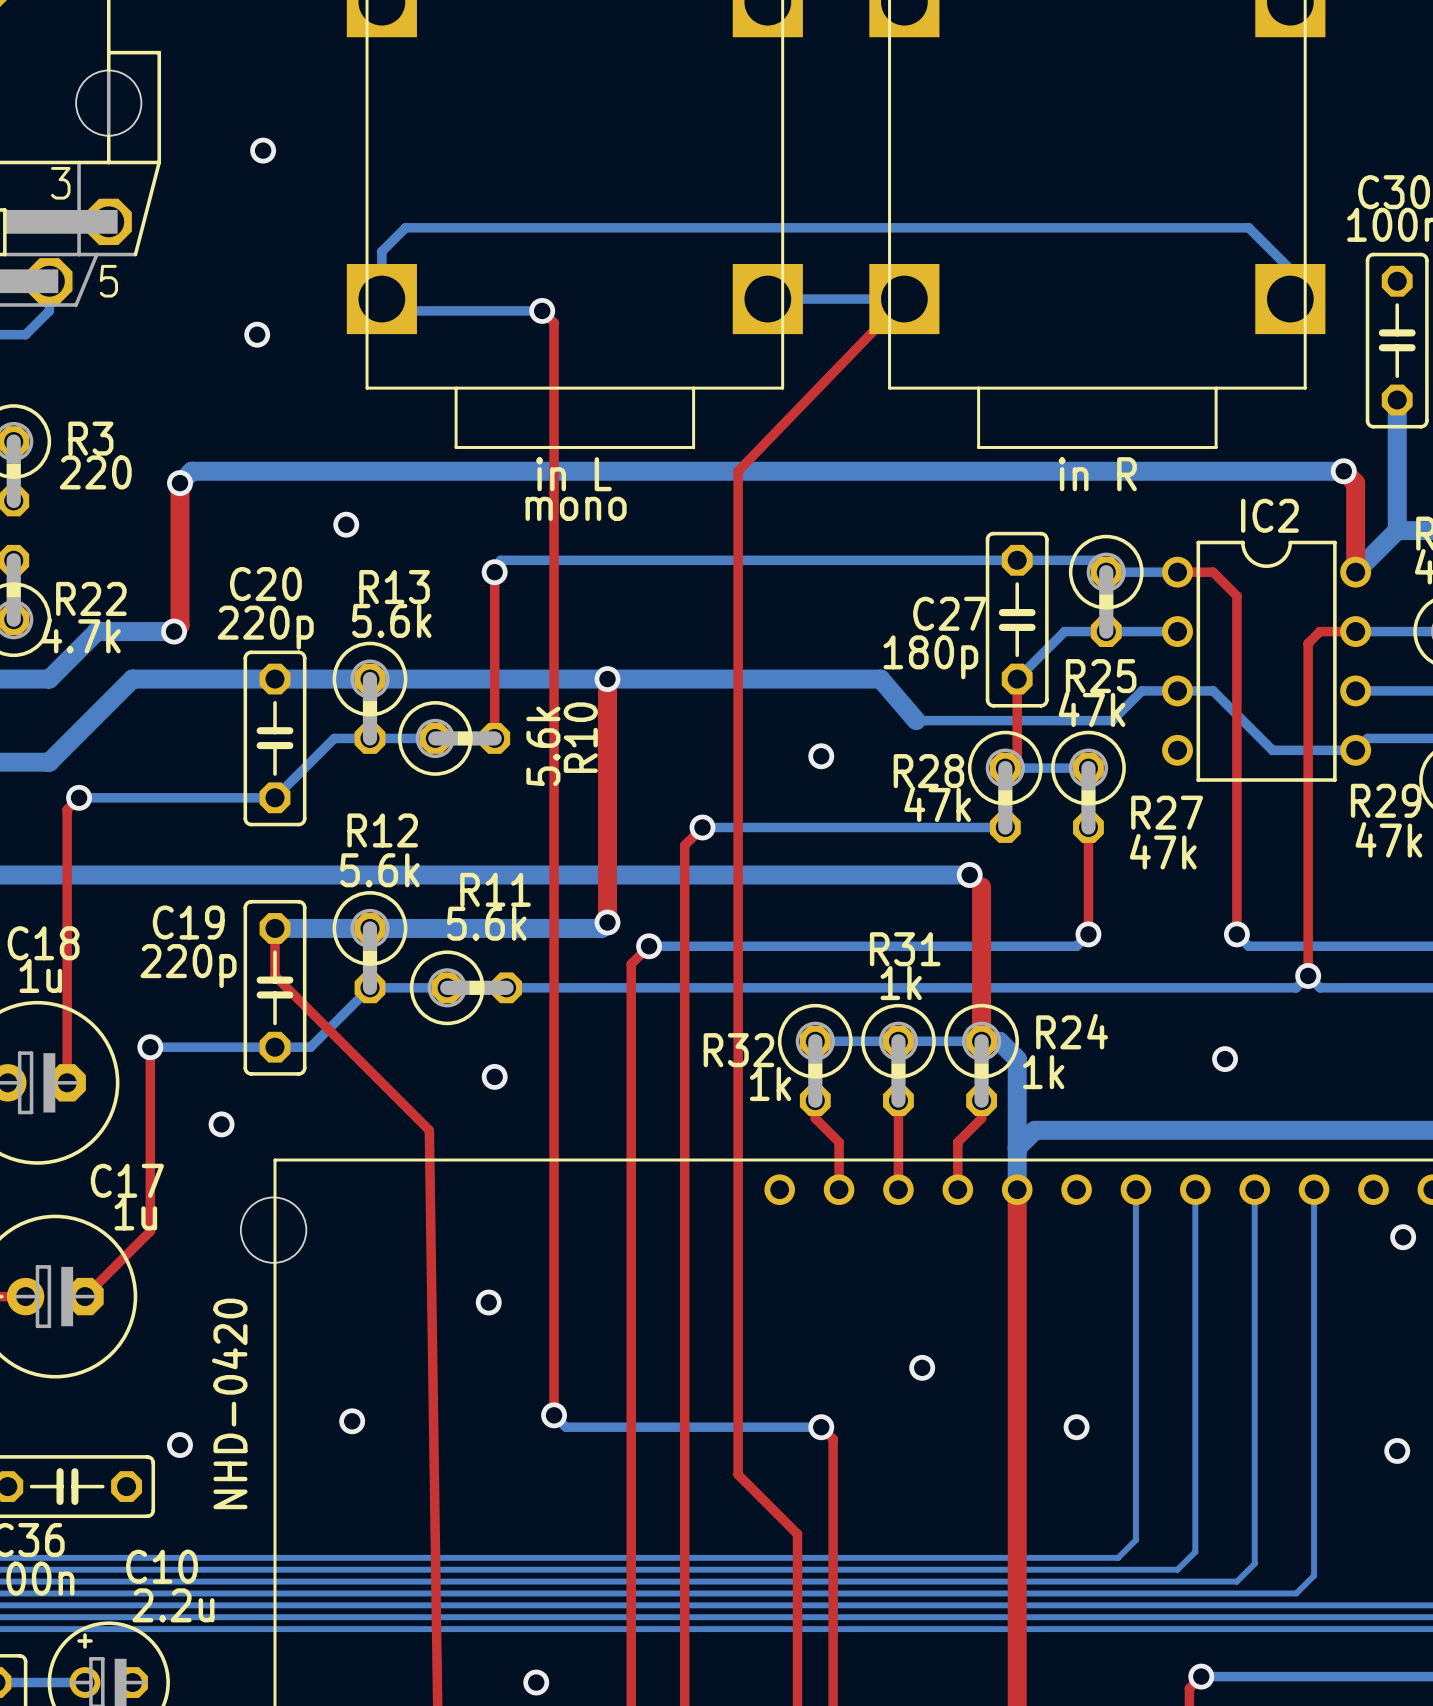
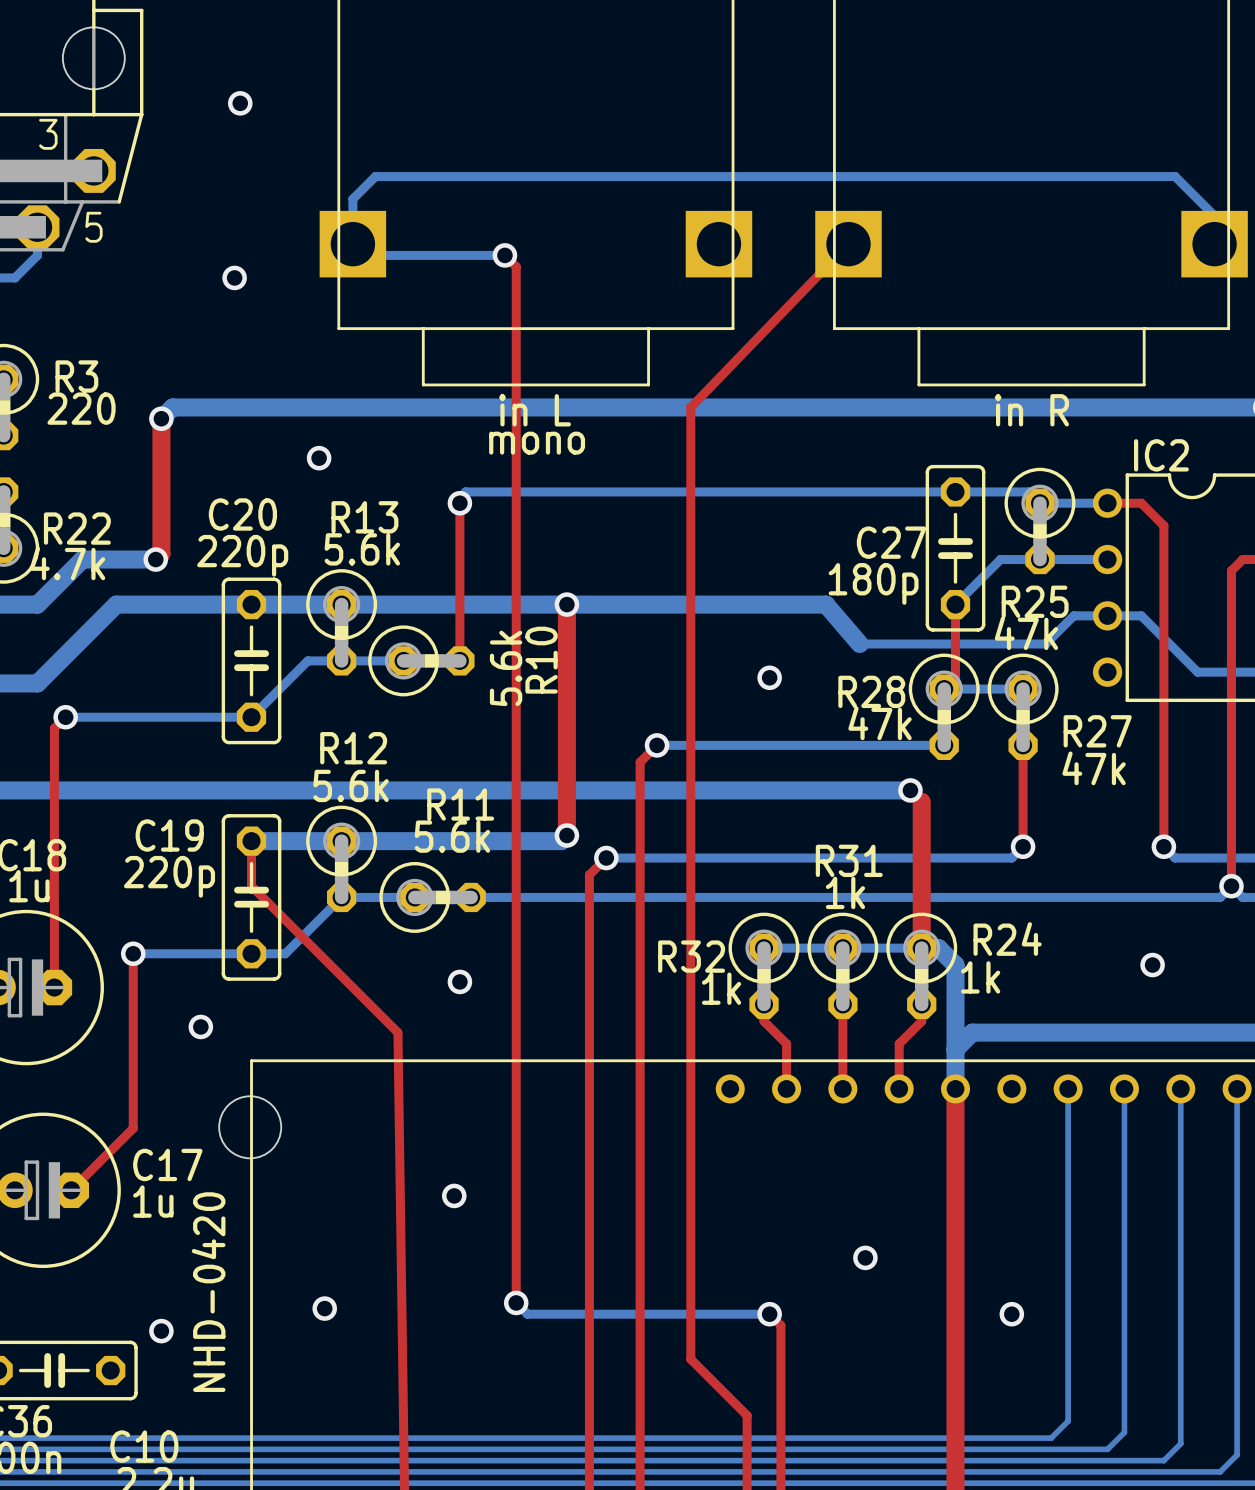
bottom track: (767, 299) (904, 299) -> none
IC2 name position: IC2 (1269, 515) -> IC2 (1161, 455)
C17 name position: C17 (127, 1180) -> C17 (167, 1164)
C17 value position: 1u (135, 1213) -> 1u (153, 1201)

